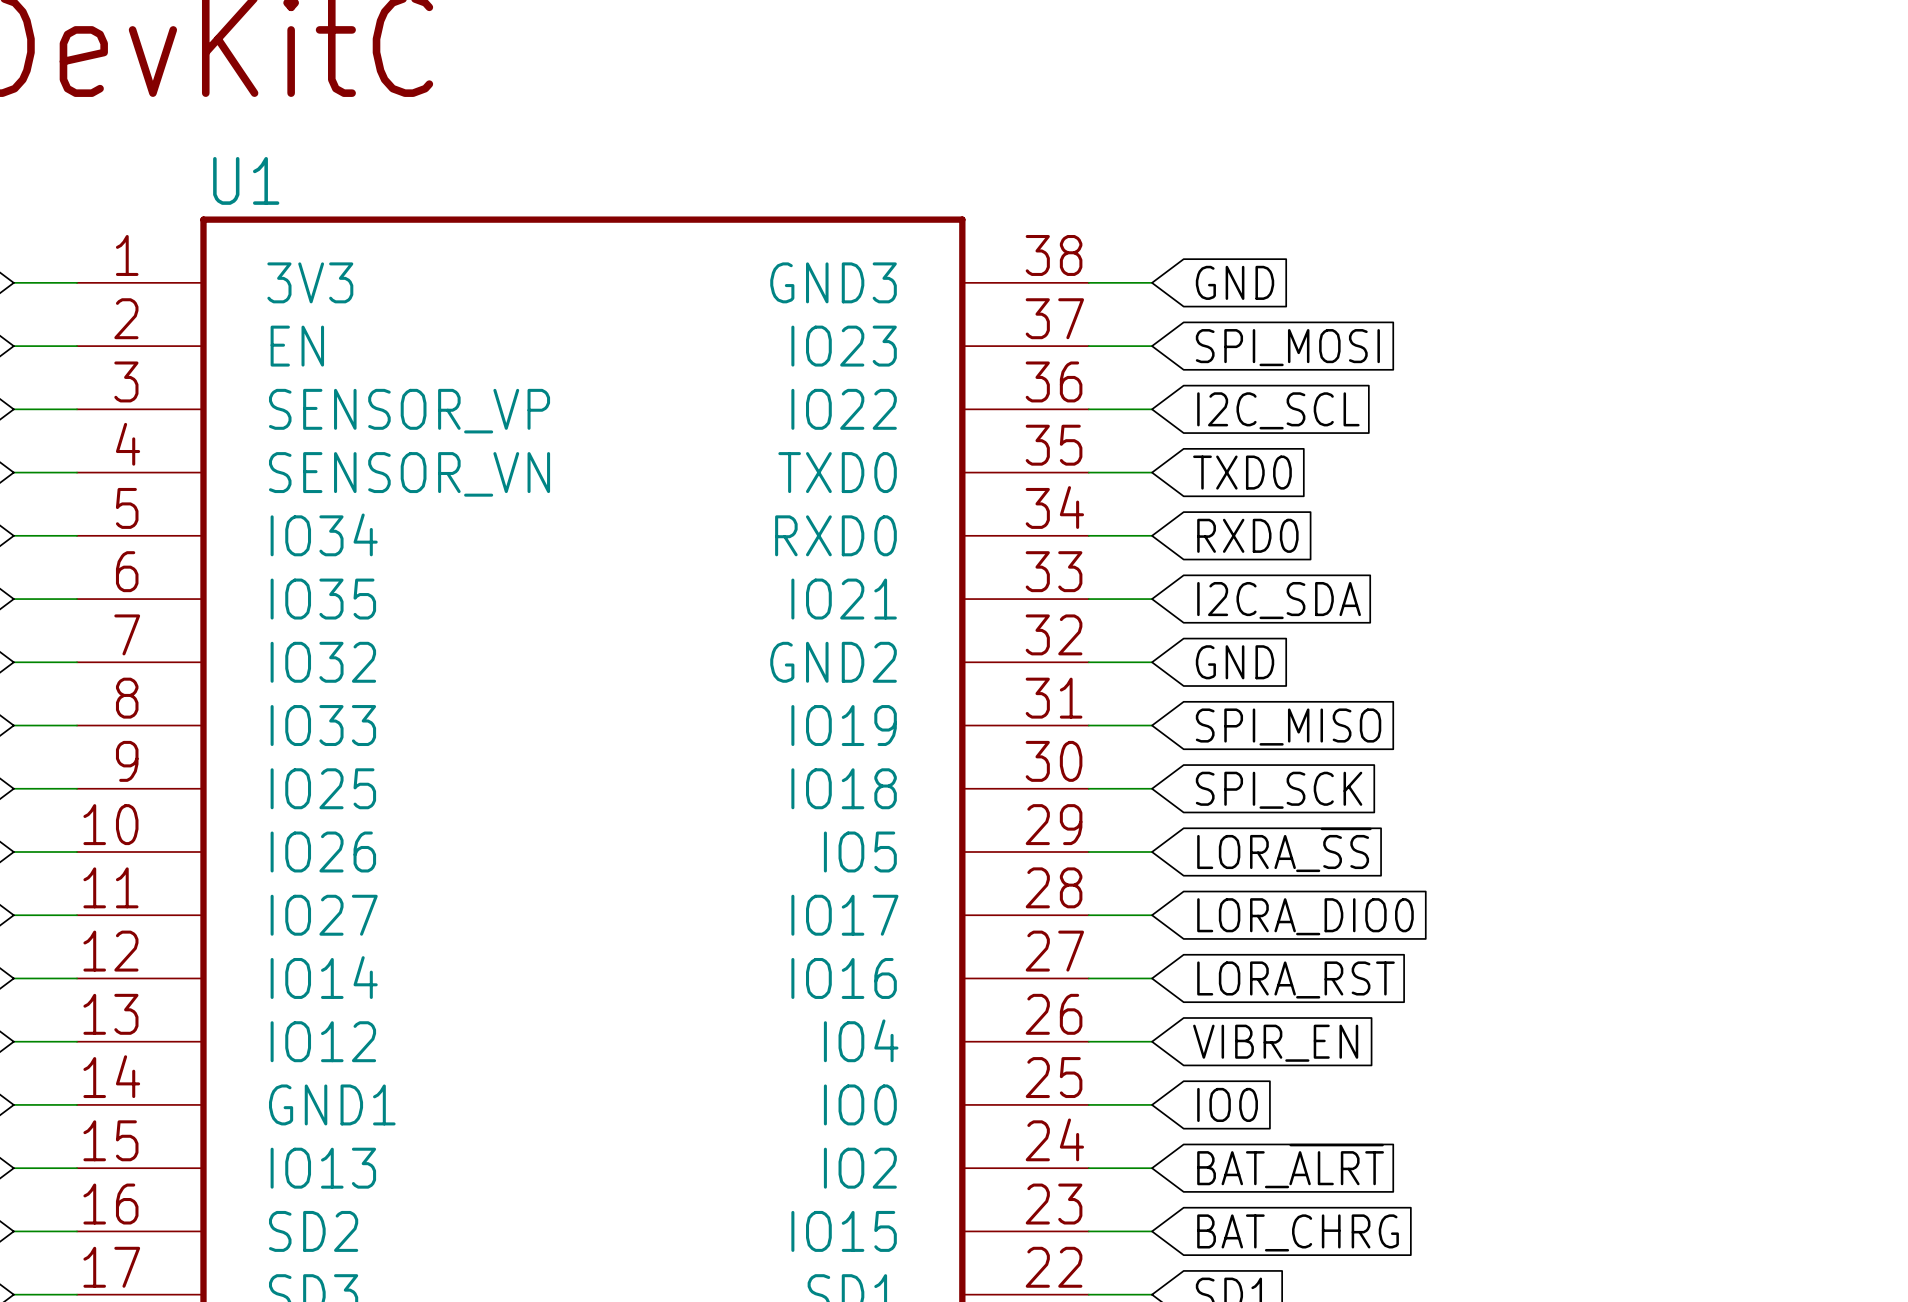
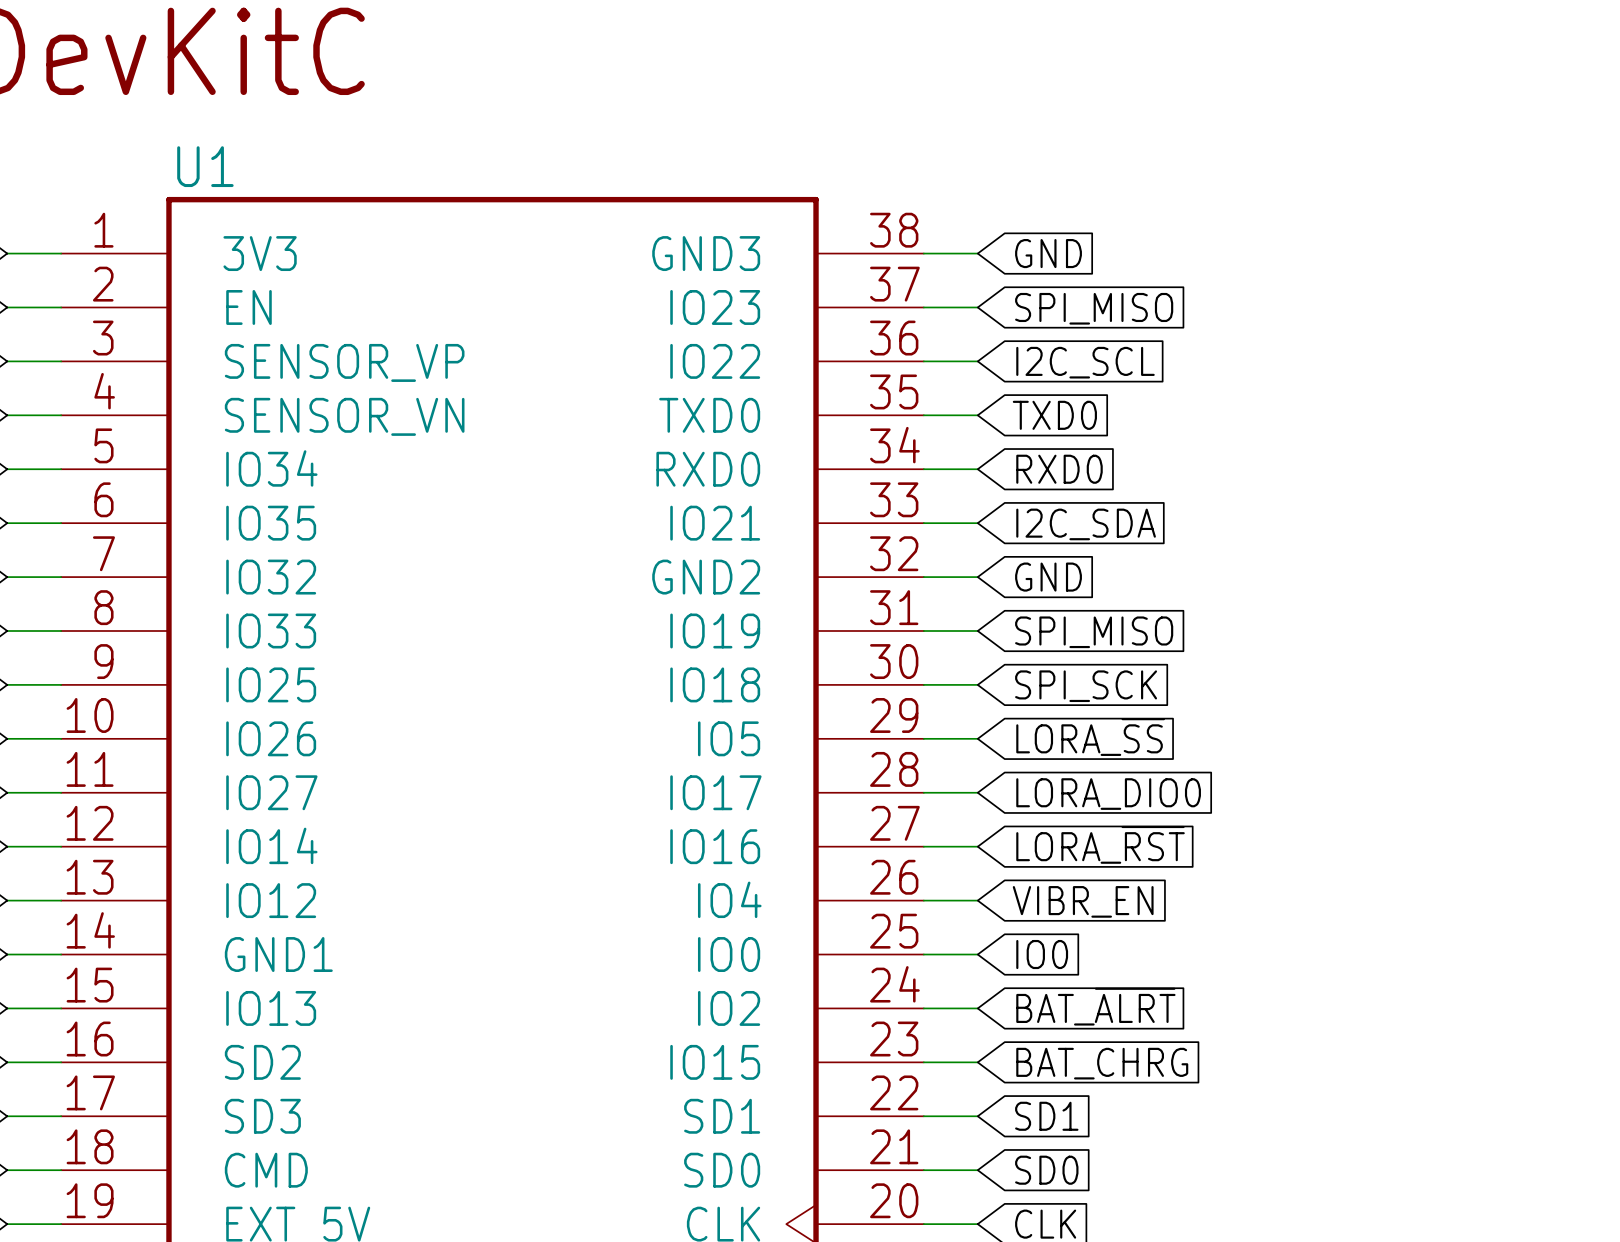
global label: SPI_MOSI (1287, 347) -> SPI_MISO (1094, 308)
global label: LORA_RST (1295, 979) -> LORA_~{RST} (1100, 844)

